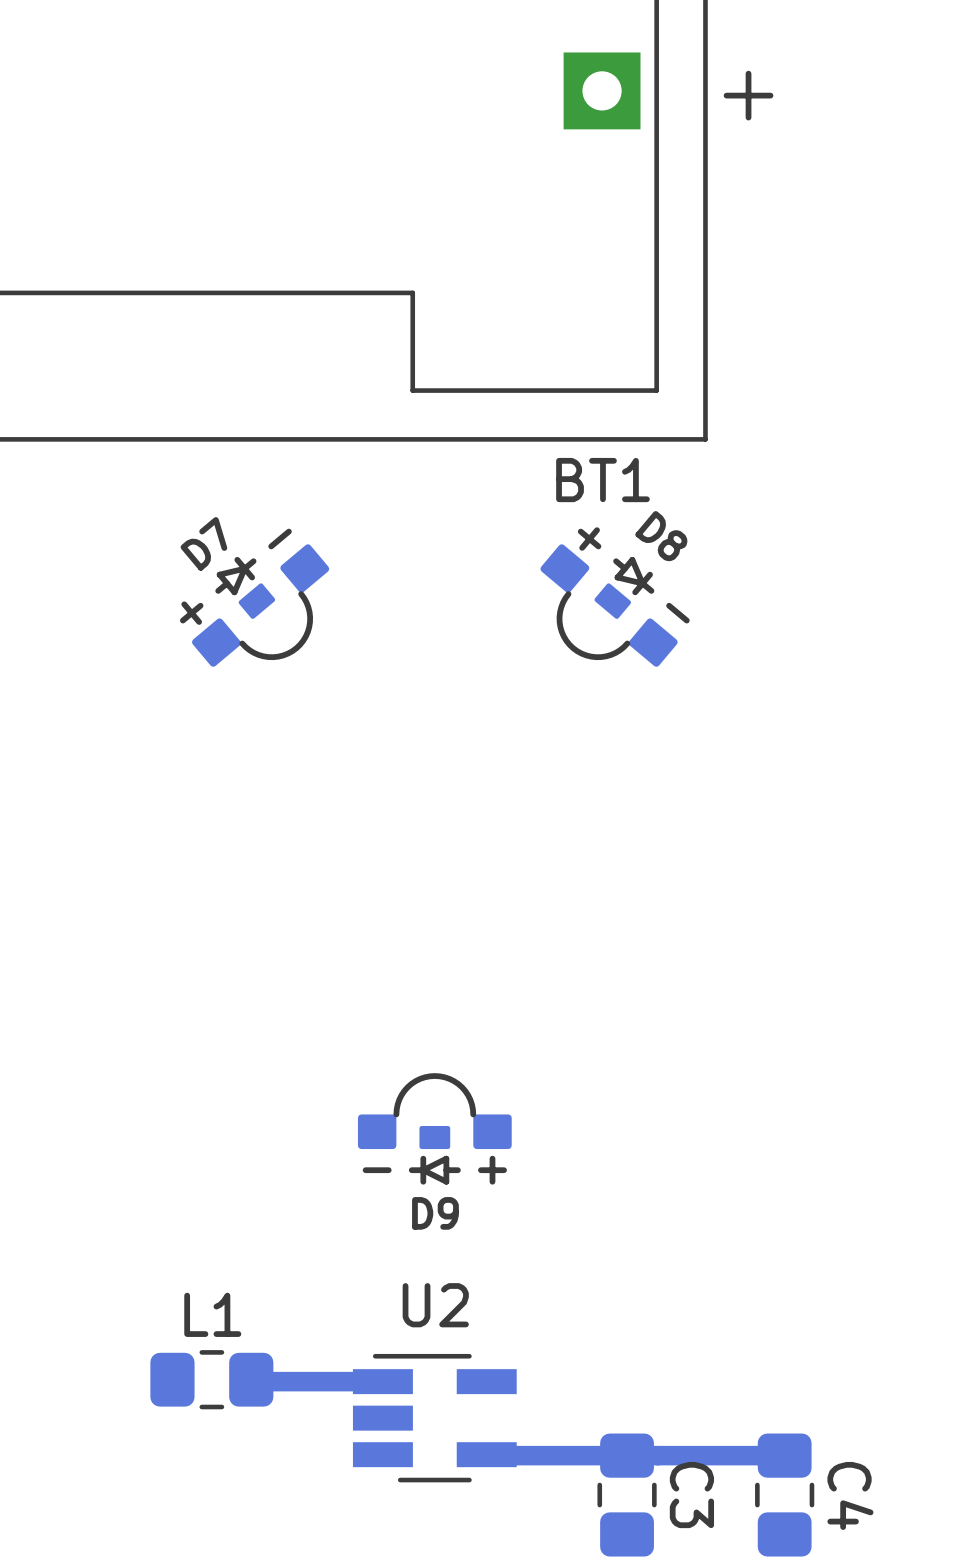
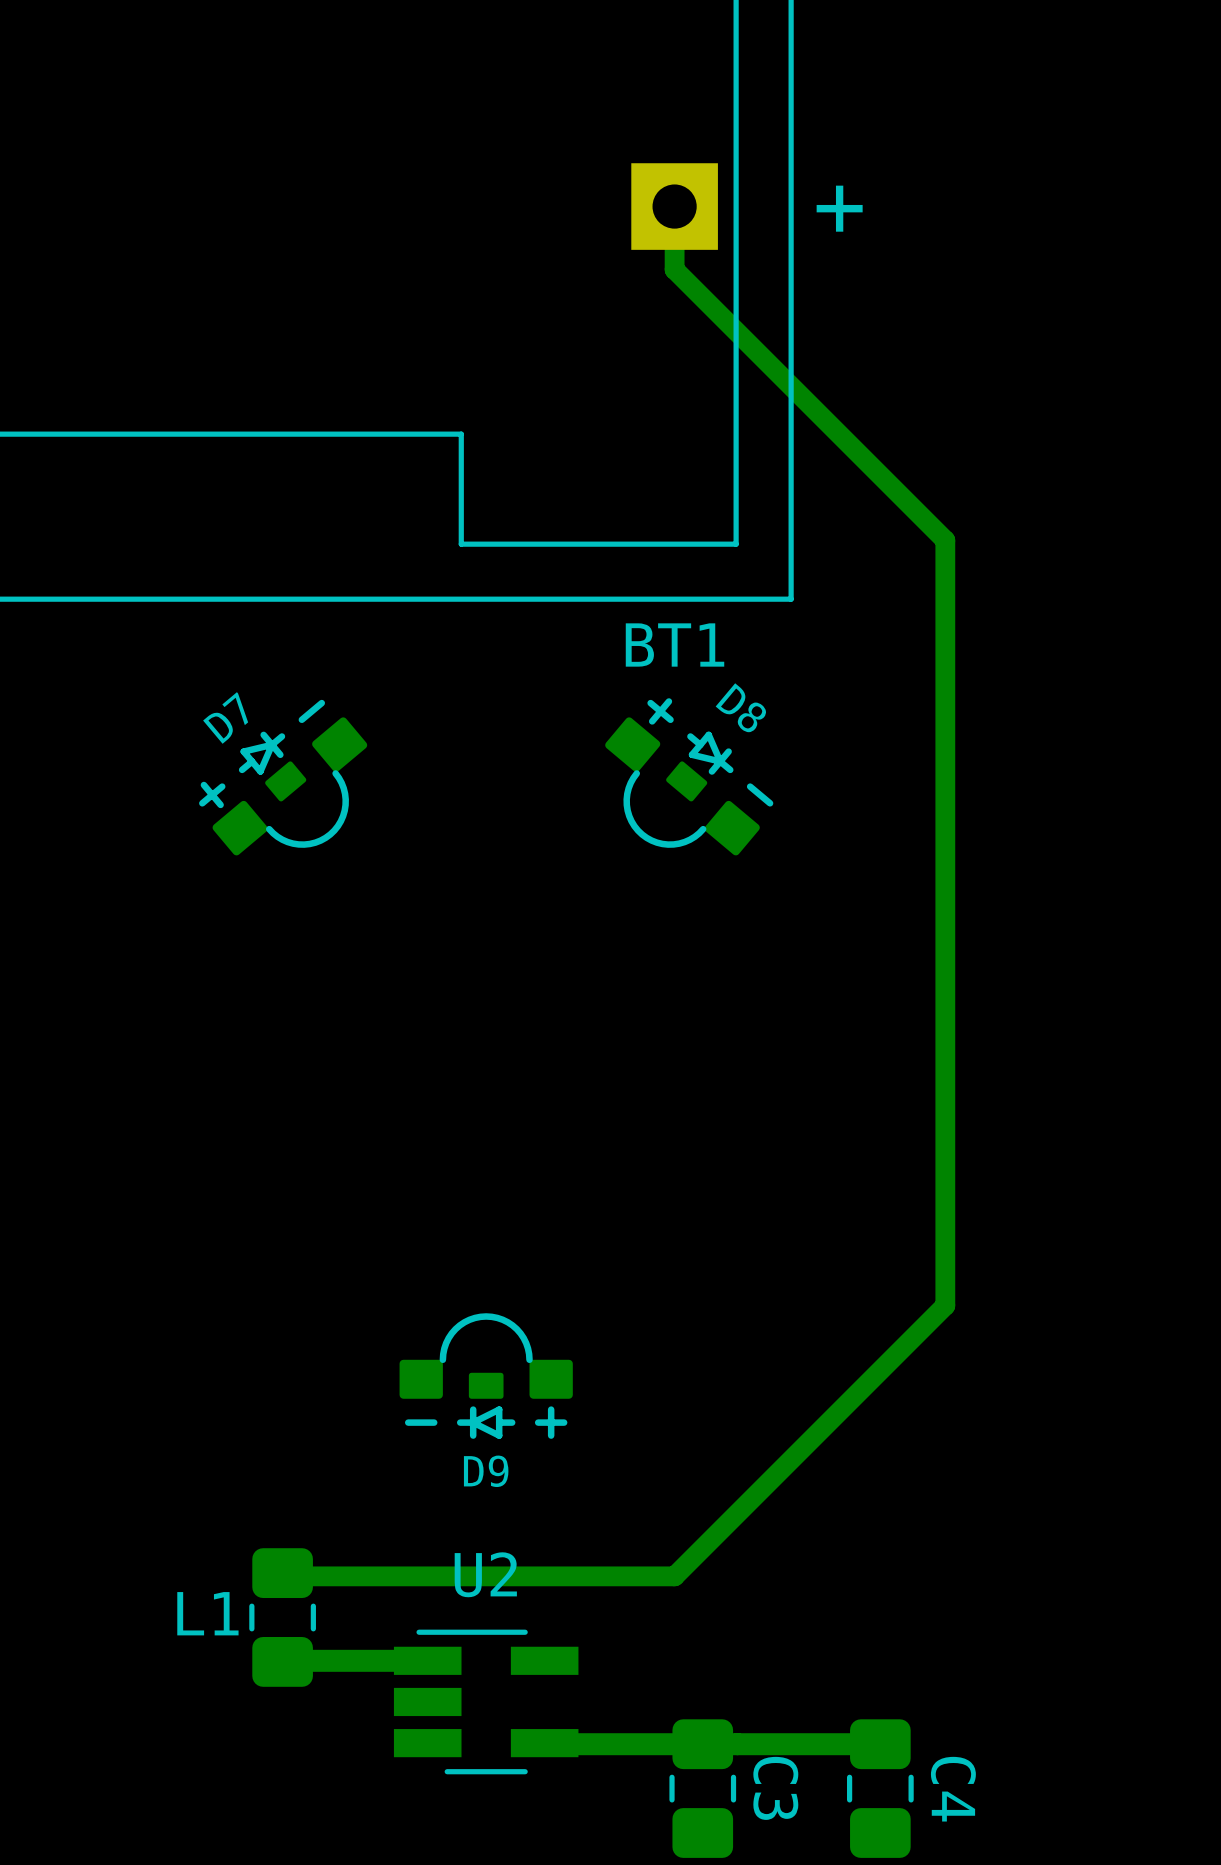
track: none -> (674, 206) (674, 269) (945, 540) (945, 1305) (674, 1576) (284, 1576)
L1 name position: L1 (212, 1314) -> L1 (207, 1613)
L1 rotation: 0° (211, 1379) -> 90° clockwise (282, 1617)

